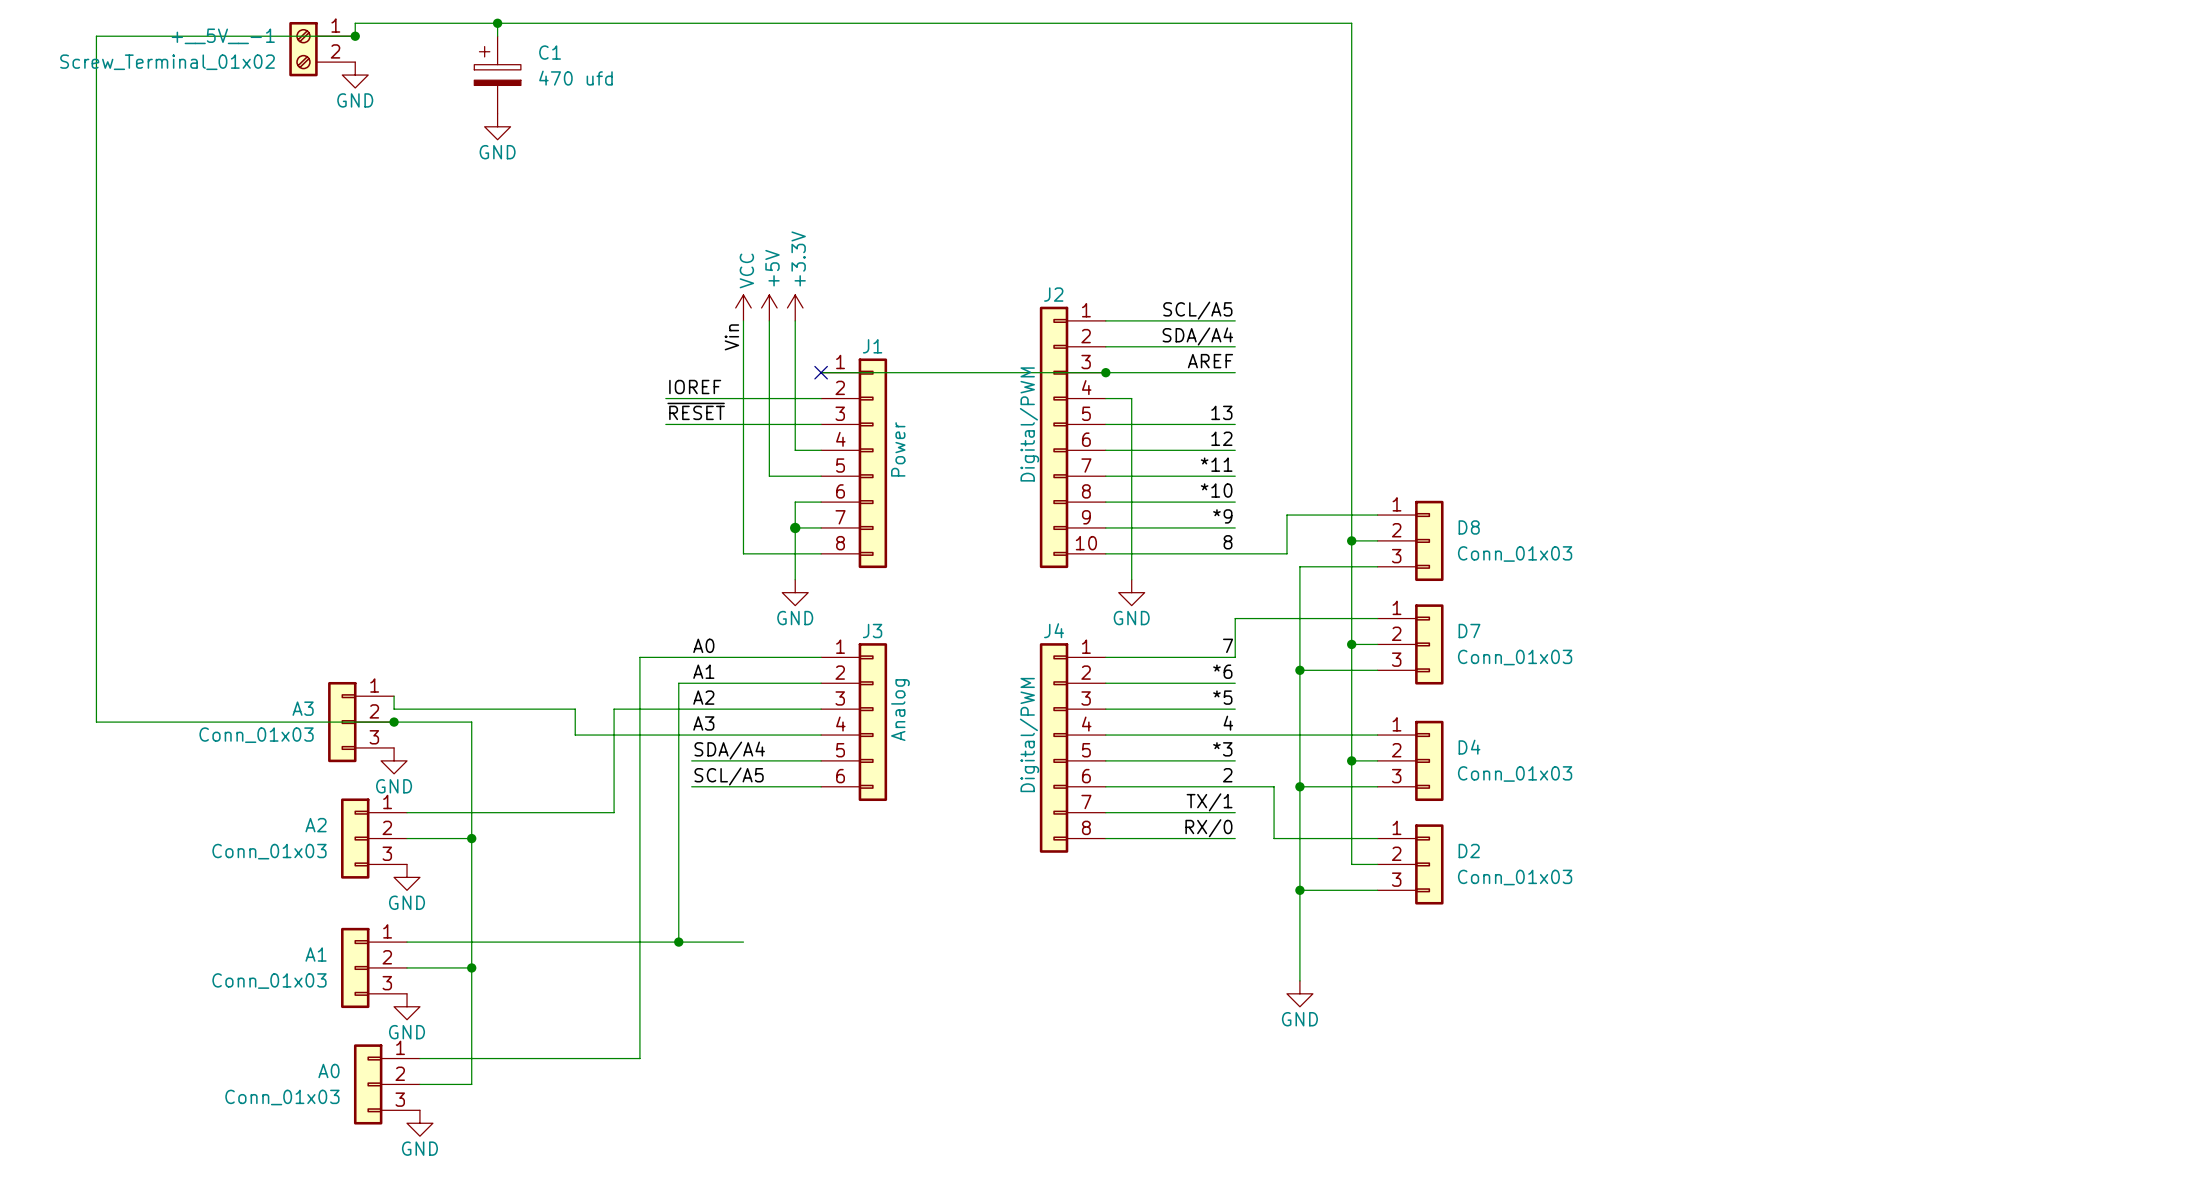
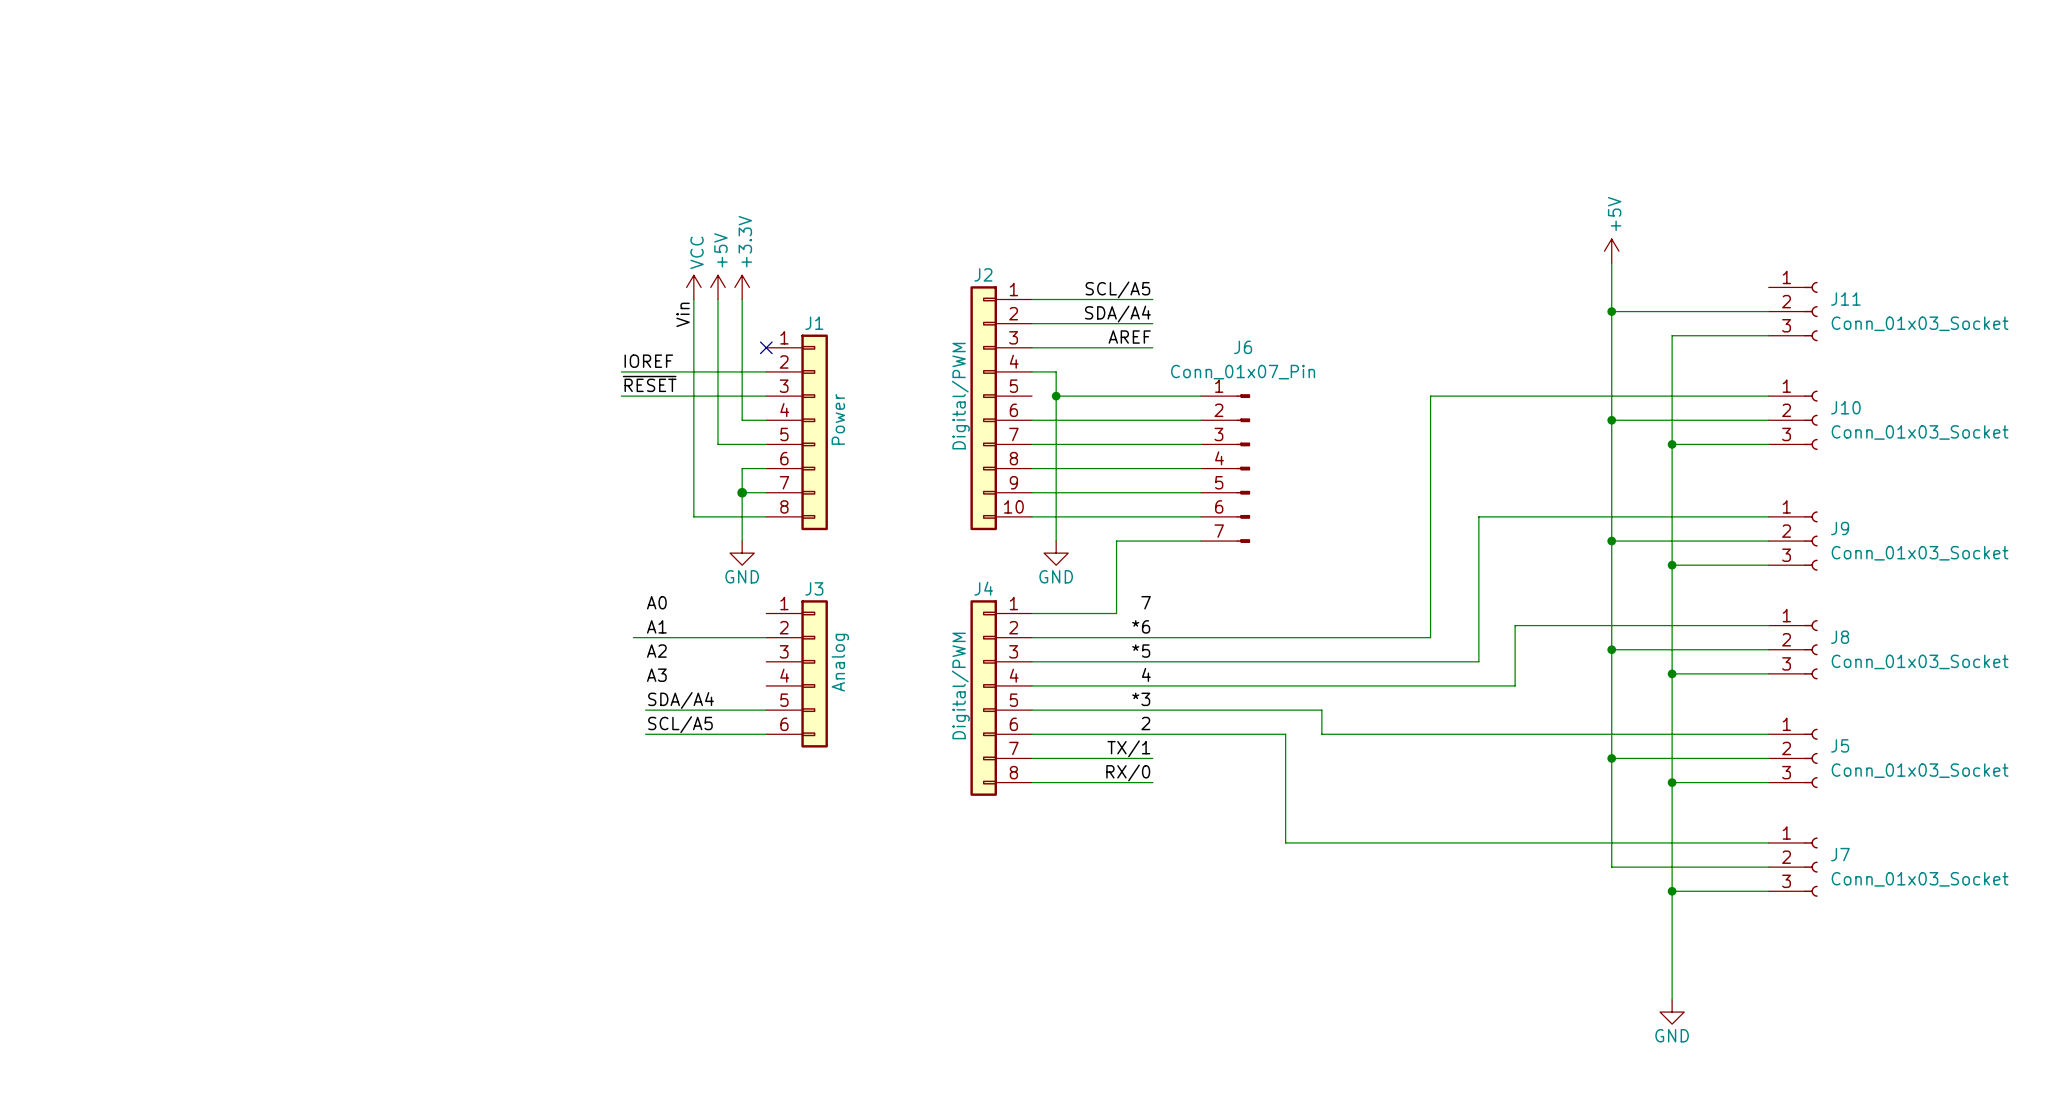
wire: (497, 23) (497, 36) -> none
junction: (497, 23) -> none
junction: (355, 36) -> none
+__5V__-1: Screw_Terminal_01x02 (322, 49) -> none
power symbol: GND (355, 75) -> none
C1: 470 ufd (497, 75) -> none
power symbol: GND (497, 126) -> none
power symbol: none -> +5V (1611, 251)
wire: none -> (1611, 263) (1611, 867) (1768, 867)
wire: none -> (1611, 311) (1768, 311)
junction: none -> (1611, 311)
J11: none -> Conn_01x03_Socket (1793, 311)
wire: none -> (1768, 335) (1672, 335) (1672, 999)
wire: (821, 372) (1105, 372) -> none
junction position: (1105, 372) -> (1056, 396)
label: 13 (1221, 412) -> none
wire: (1105, 424) (1131, 424) -> none
wire: none -> (1152, 396) (1201, 396)
wire: none -> (1768, 396) (1430, 396) (1430, 637) (1152, 637)
label: 12 (1221, 438) -> none
wire: none -> (1152, 420) (1201, 420)
wire: none -> (1611, 420) (1768, 420)
junction: none -> (1611, 420)
J10: none -> Conn_01x03_Socket (1793, 420)
label: *11 (1216, 464) -> none
wire: none -> (1152, 444) (1201, 444)
wire: none -> (1672, 444) (1768, 444)
junction: none -> (1672, 444)
label: *10 (1216, 490) -> none
wire: none -> (1152, 468) (1201, 468)
J6: none -> Conn_01x07_Pin (1225, 468)
wire: (1377, 515) (1286, 515) (1286, 553) -> none
label: *9 (1222, 516) -> none
wire: none -> (1152, 492) (1201, 492)
wire: (1351, 540) (1377, 540) -> none
junction: (1351, 540) -> none
D8: Conn_01x03 (1410, 540) -> none
label: 8 (1228, 542) -> none
wire: none -> (1768, 516) (1478, 516) (1478, 661) (1152, 661)
wire: (1377, 566) (1299, 566) (1299, 980) -> none
wire: none -> (1611, 541) (1768, 541)
junction: none -> (1611, 541)
J9: none -> Conn_01x03_Socket (1793, 541)
wire: none -> (1672, 565) (1768, 565)
junction: none -> (1672, 565)
wire: (1377, 618) (1235, 618) (1235, 657) (1196, 657) -> (1201, 541) (1116, 541) (1116, 613)
wire: (1351, 644) (1377, 644) -> none
junction: (1351, 644) -> none
D7: Conn_01x03 (1410, 644) -> none
wire: (821, 657) (639, 657) (639, 1058) (419, 1058) -> none
wire: (1299, 670) (1377, 670) -> none
junction: (1299, 670) -> none
wire: none -> (1768, 625) (1515, 625) (1515, 685) (1285, 685)
wire: (678, 683) (678, 942) -> none
wire: (394, 696) (394, 709) (575, 709) (575, 735) (821, 735) -> none
wire: none -> (1611, 649) (1768, 649)
junction: none -> (1611, 649)
J8: none -> Conn_01x03_Socket (1793, 649)
wire: (821, 709) (614, 709) (614, 812) (407, 812) -> none
A3: Conn_01x03 (361, 722) -> none
junction: (394, 722) -> none
wire: none -> (1672, 673) (1768, 673)
junction: none -> (1672, 673)
power symbol: GND (394, 760) -> none
wire: none -> (1152, 710) (1261, 710)
junction: (1351, 760) -> none
wire: none -> (1285, 710) (1321, 710) (1321, 734) (1768, 734)
D4: Conn_01x03 (1410, 760) -> none
wire: (1274, 786) (1274, 838) (1377, 838) -> (1189, 734) (1213, 734)
junction: (1299, 786) -> none
wire: none -> (1285, 734) (1285, 842) (1768, 842)
wire: none -> (1611, 758) (1768, 758)
junction: none -> (1611, 758)
J5: none -> Conn_01x03_Socket (1793, 758)
A2: Conn_01x03 (374, 838) -> none
wire: (407, 838) (471, 838) -> none
junction: (471, 838) -> none
wire: none -> (1672, 782) (1768, 782)
junction: none -> (1672, 782)
wire: (1377, 864) (1351, 864) (1351, 23) (355, 23) (355, 36) (96, 36) (96, 722) (471, 722) (471, 1084) (419, 1084) -> none
D2: Conn_01x03 (1410, 864) -> none
power symbol: GND (407, 877) -> none
wire: (1299, 890) (1377, 890) -> none
junction: (1299, 890) -> none
J7: none -> Conn_01x03_Socket (1793, 867)
wire: (407, 942) (743, 942) -> none
junction: (678, 942) -> none
wire: none -> (1672, 891) (1768, 891)
junction: none -> (1672, 891)
A1: Conn_01x03 (374, 967) -> none
wire: (407, 967) (471, 967) -> none
junction: (471, 967) -> none
power symbol: GND (1299, 993) -> none
power symbol: GND (407, 1006) -> none
A0: Conn_01x03 (386, 1084) -> none
power symbol: none -> GND (1672, 1012)
power symbol: GND (419, 1123) -> none

